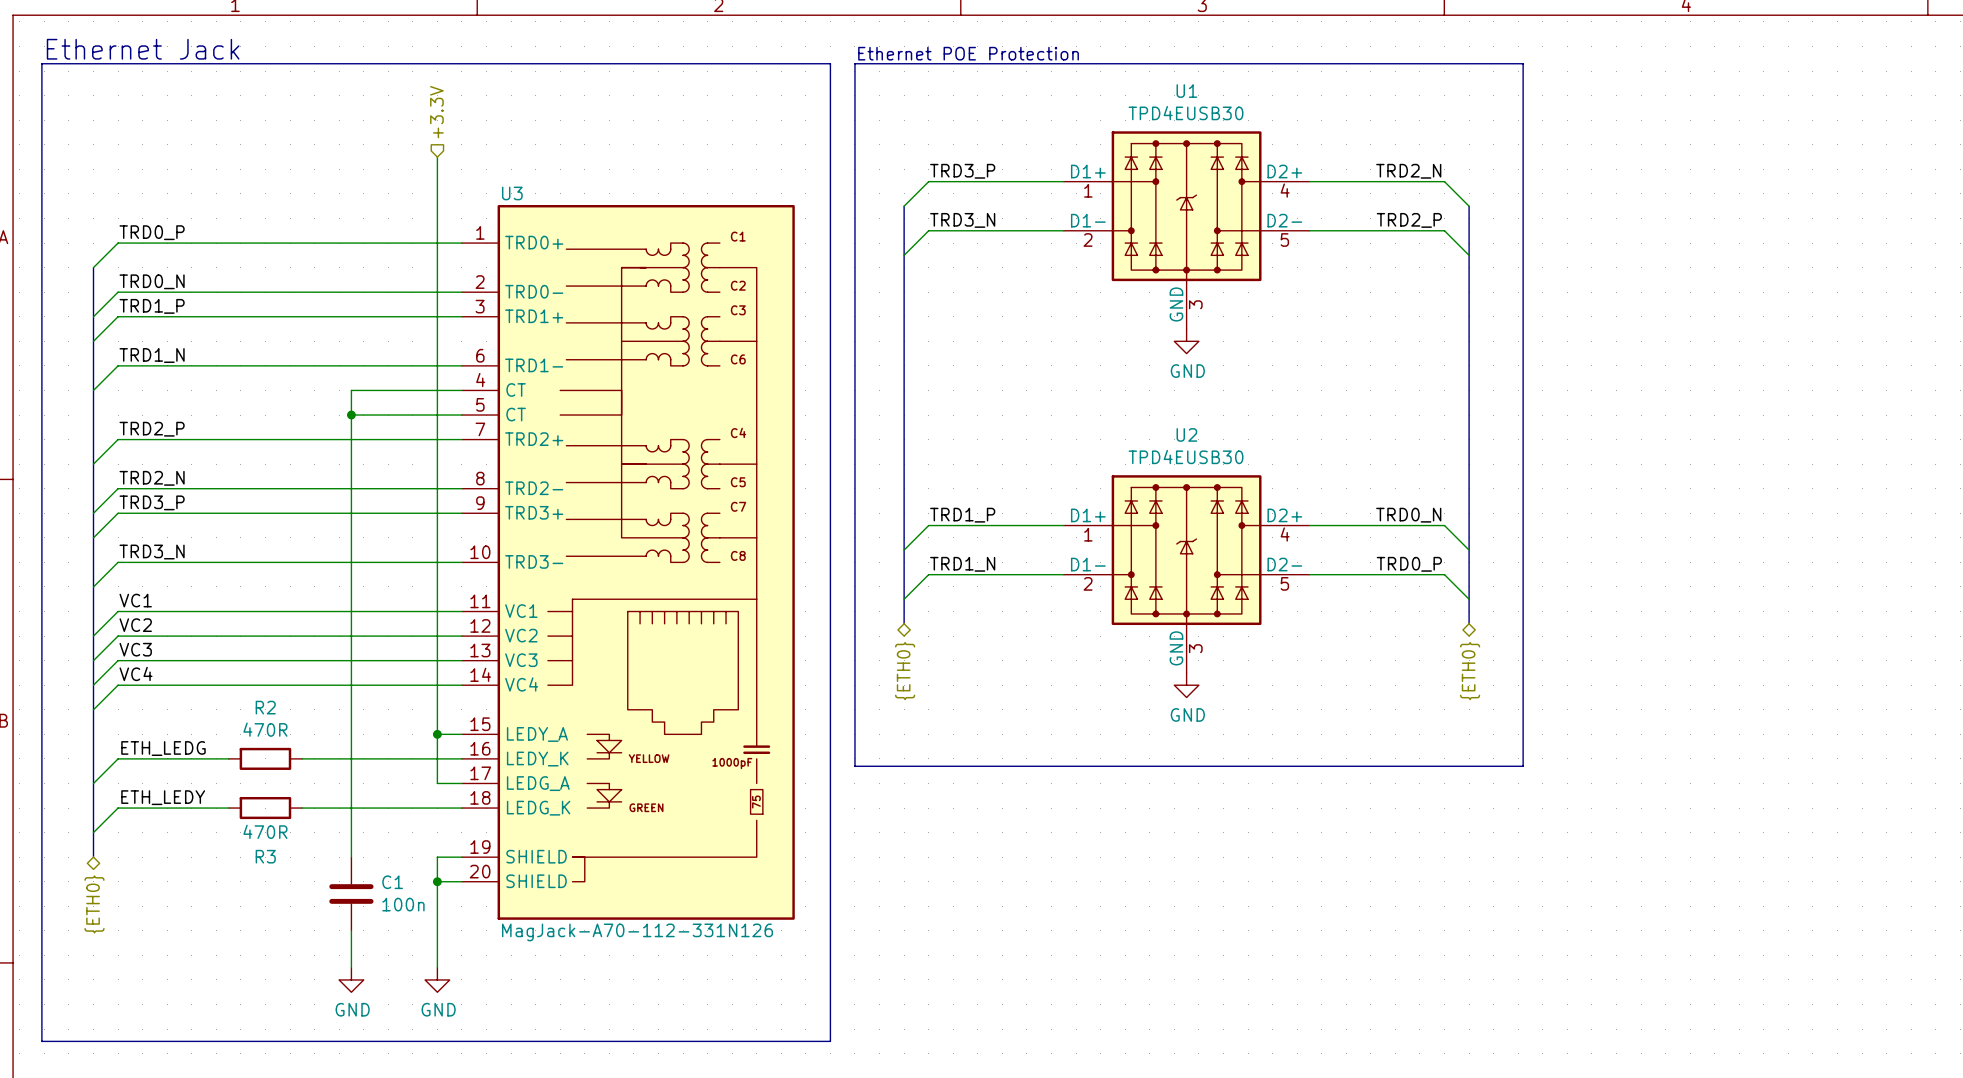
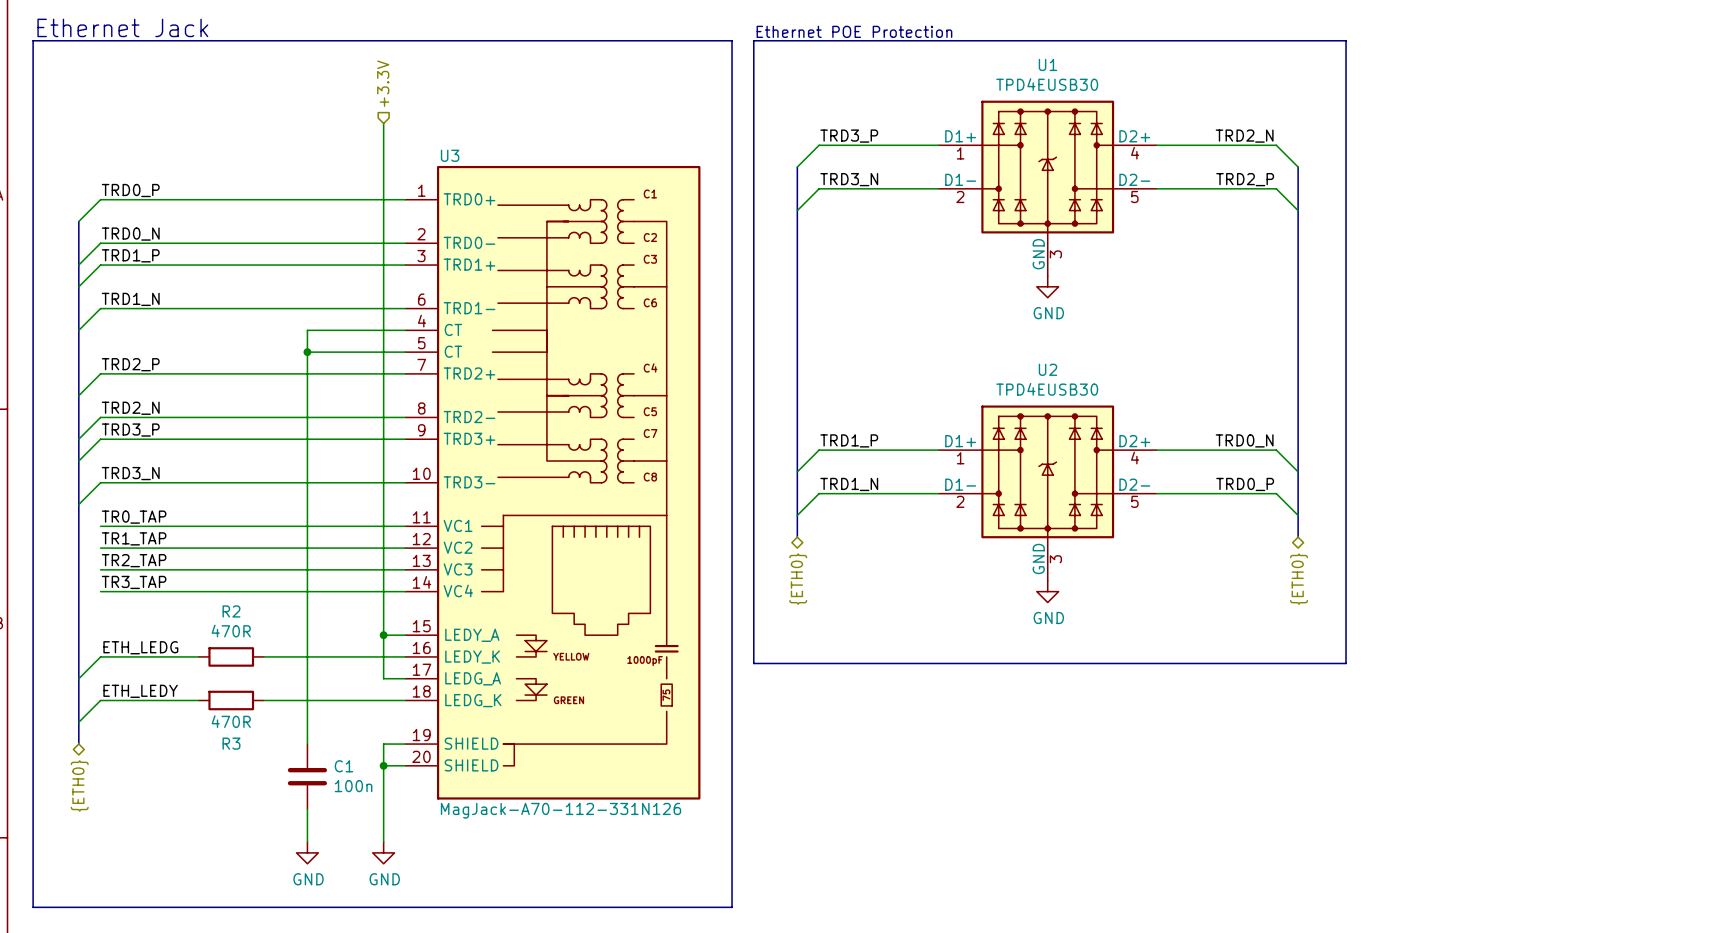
label: VC1 (135, 600) -> TR0_TAP (134, 517)
wire: (118, 611) (93, 636) -> none
label: VC2 (135, 625) -> TR1_TAP (134, 538)
wire: (118, 636) (93, 660) -> none
label: VC3 (135, 649) -> TR2_TAP (134, 560)
wire: (118, 660) (93, 685) -> none
label: VC4 (135, 673) -> TR3_TAP (134, 582)
wire: (118, 685) (93, 709) -> none

